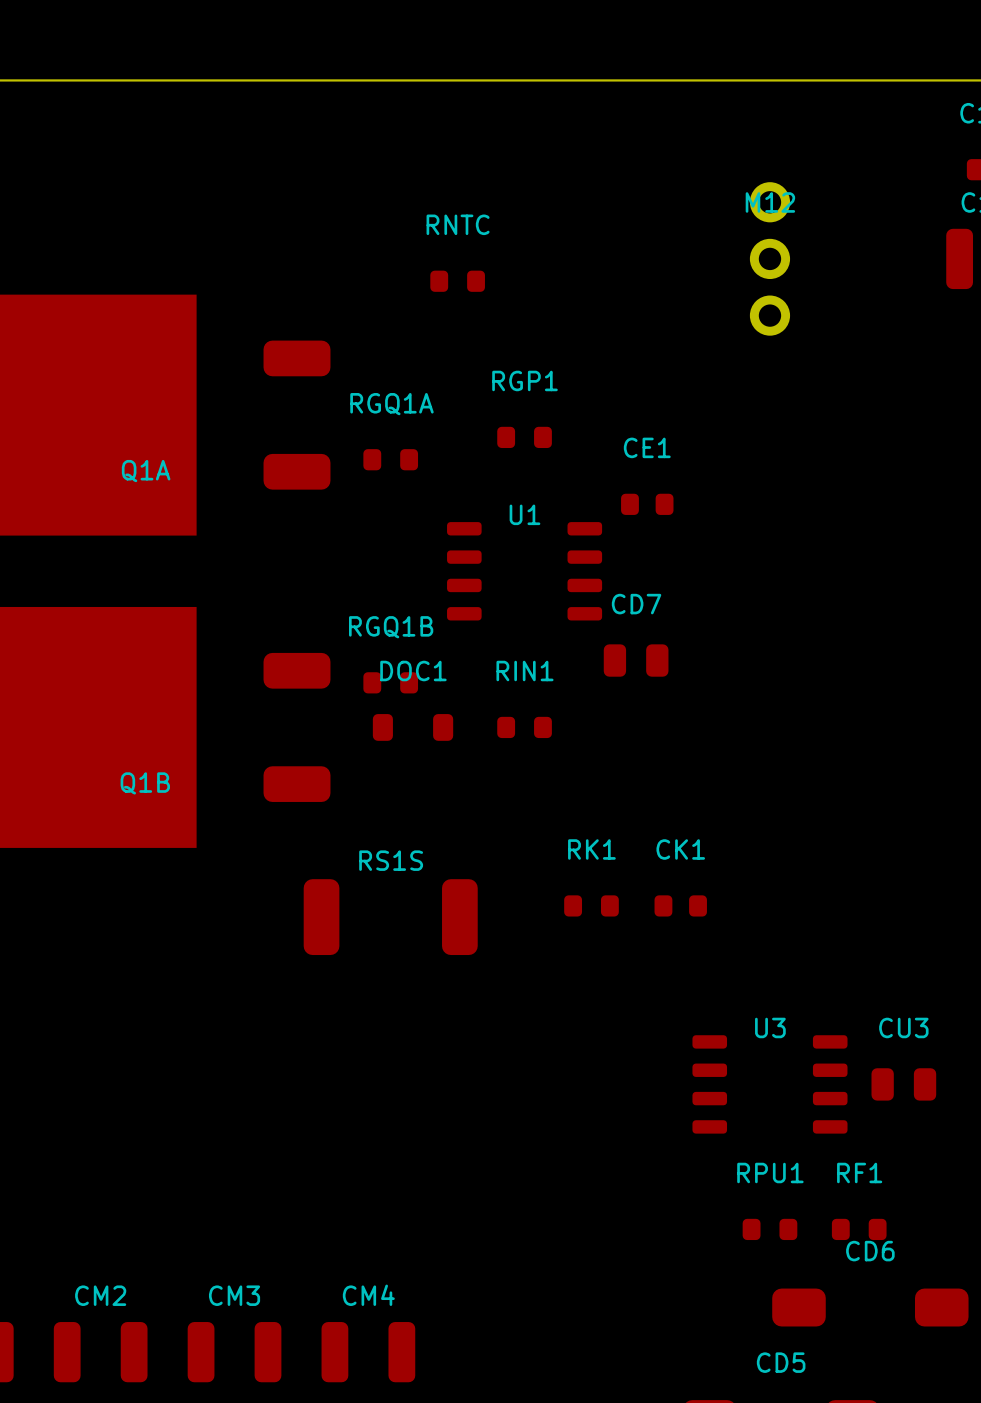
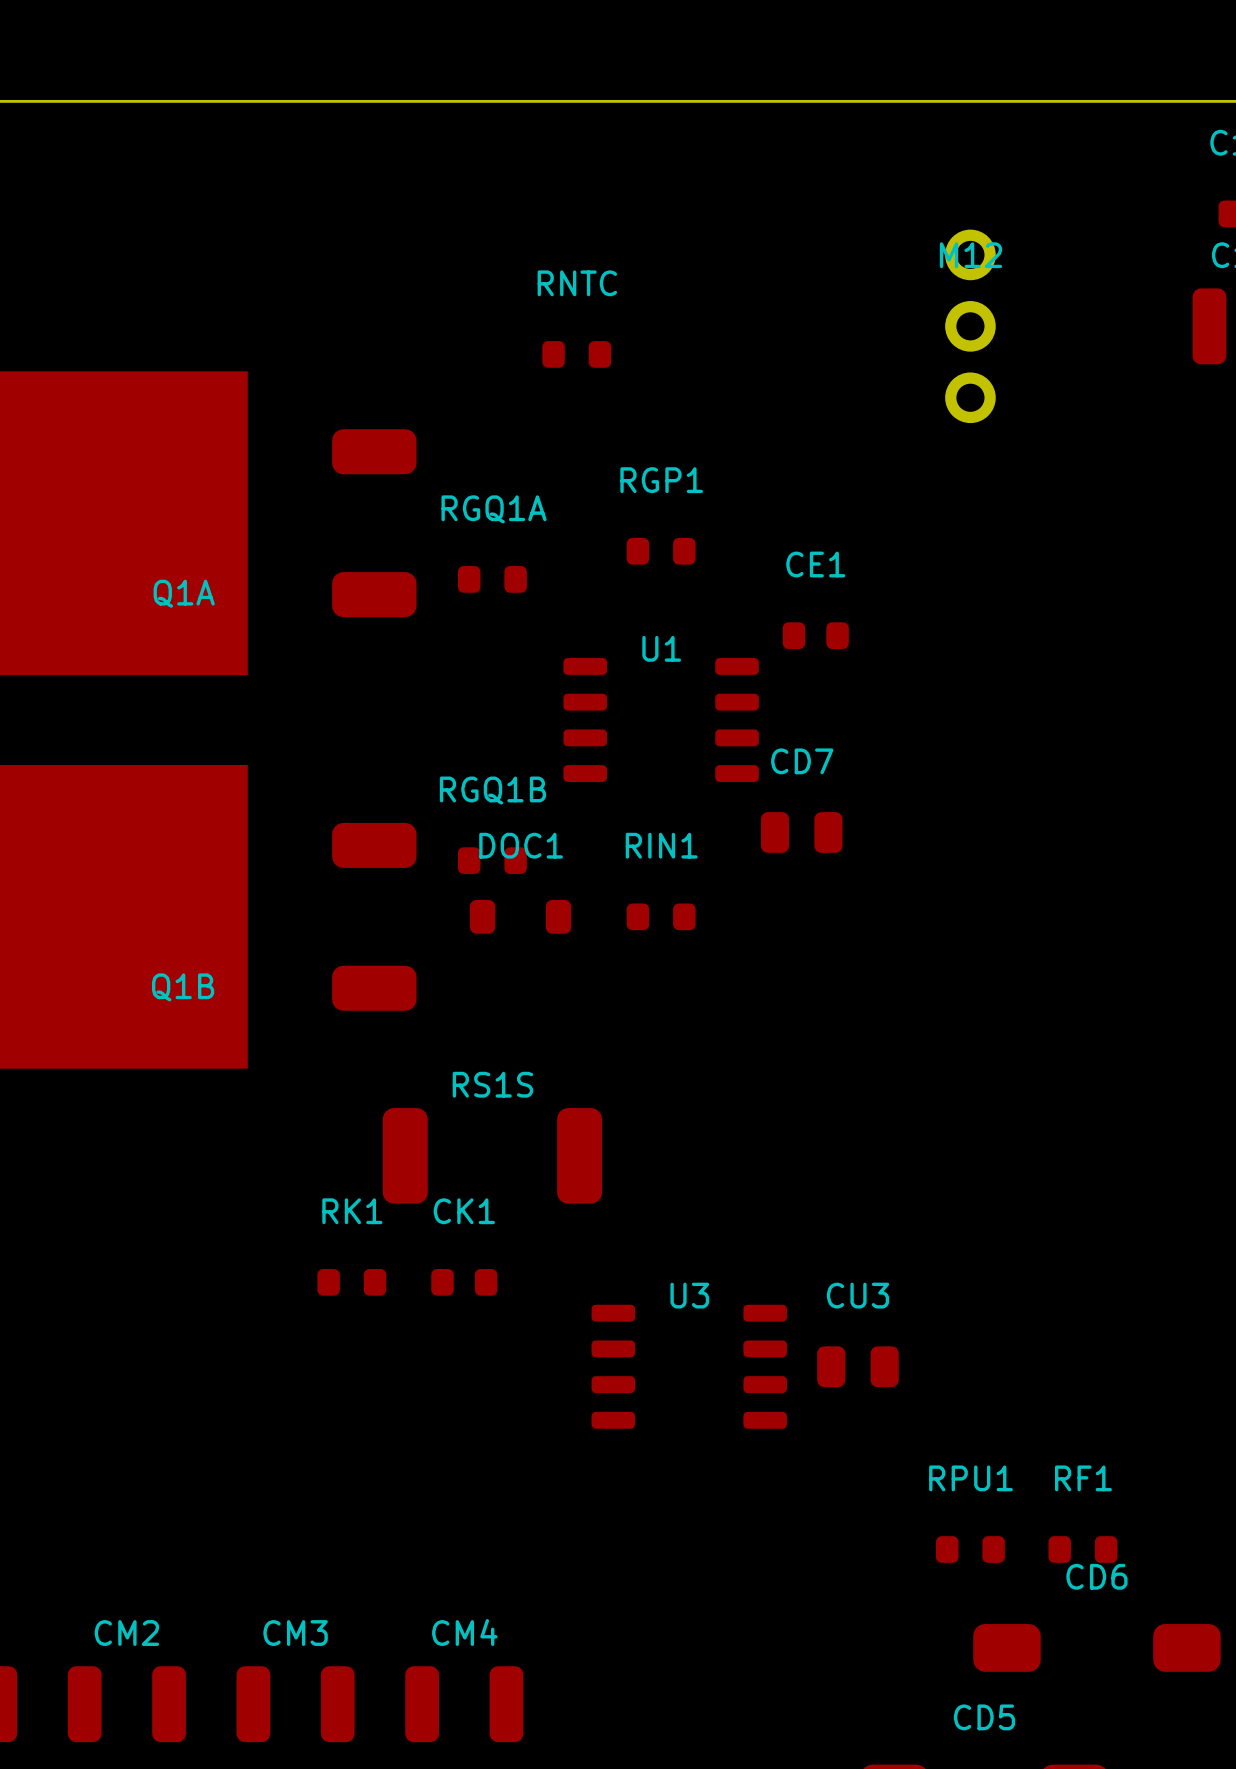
RK1 position: (591, 905) -> (351, 1282)
CK1 position: (680, 905) -> (464, 1282)
U3 position: (769, 1084) -> (689, 1366)
CU3 position: (903, 1084) -> (857, 1366)

